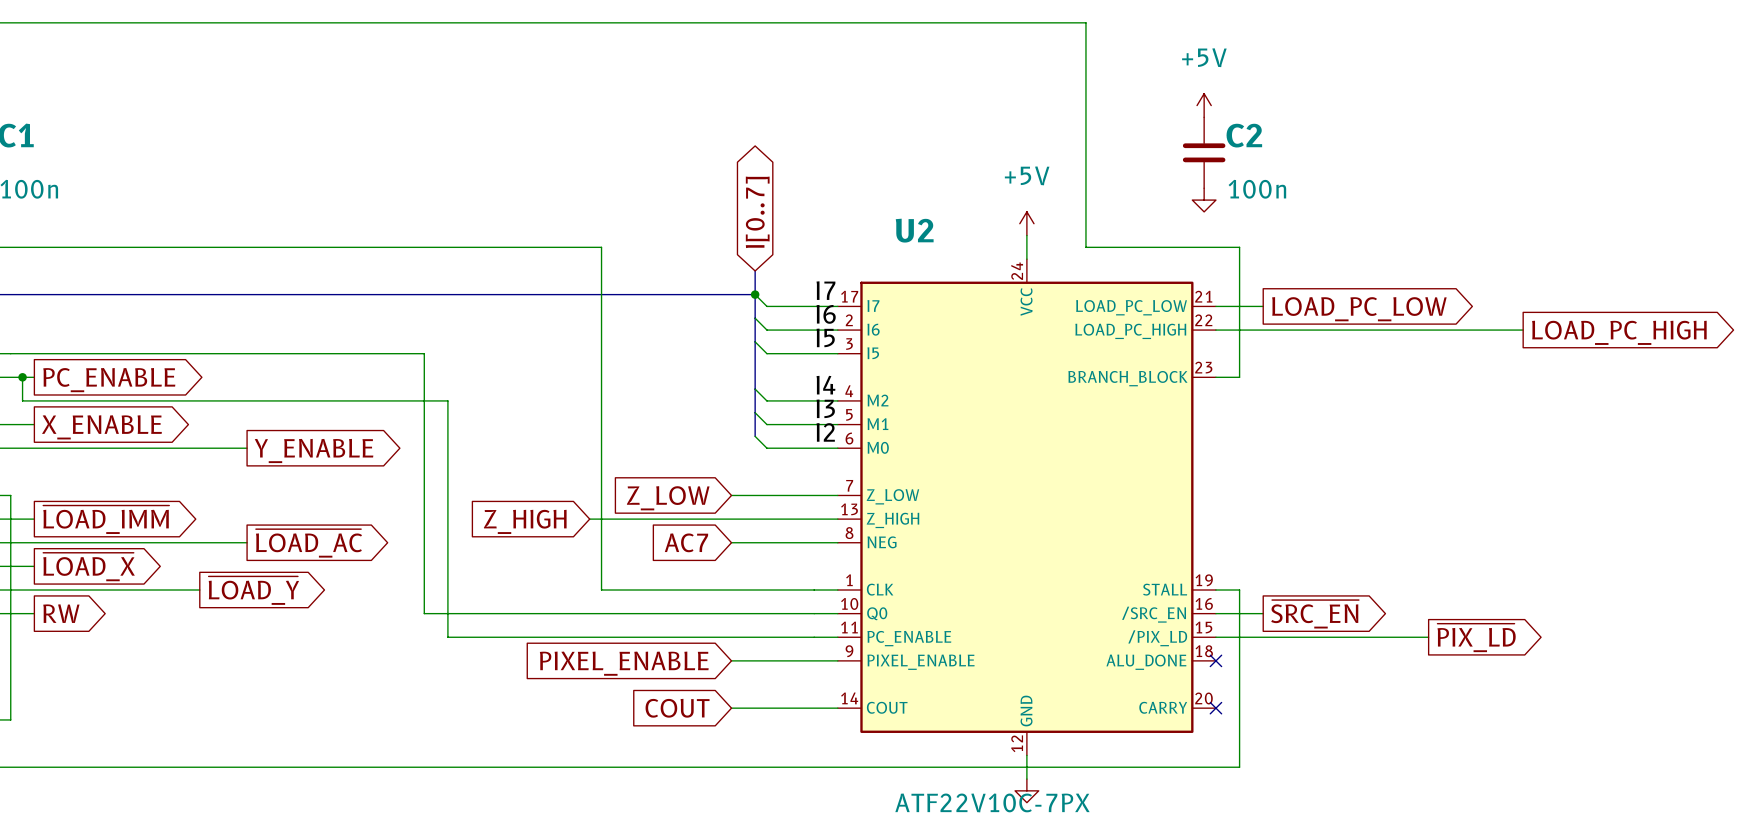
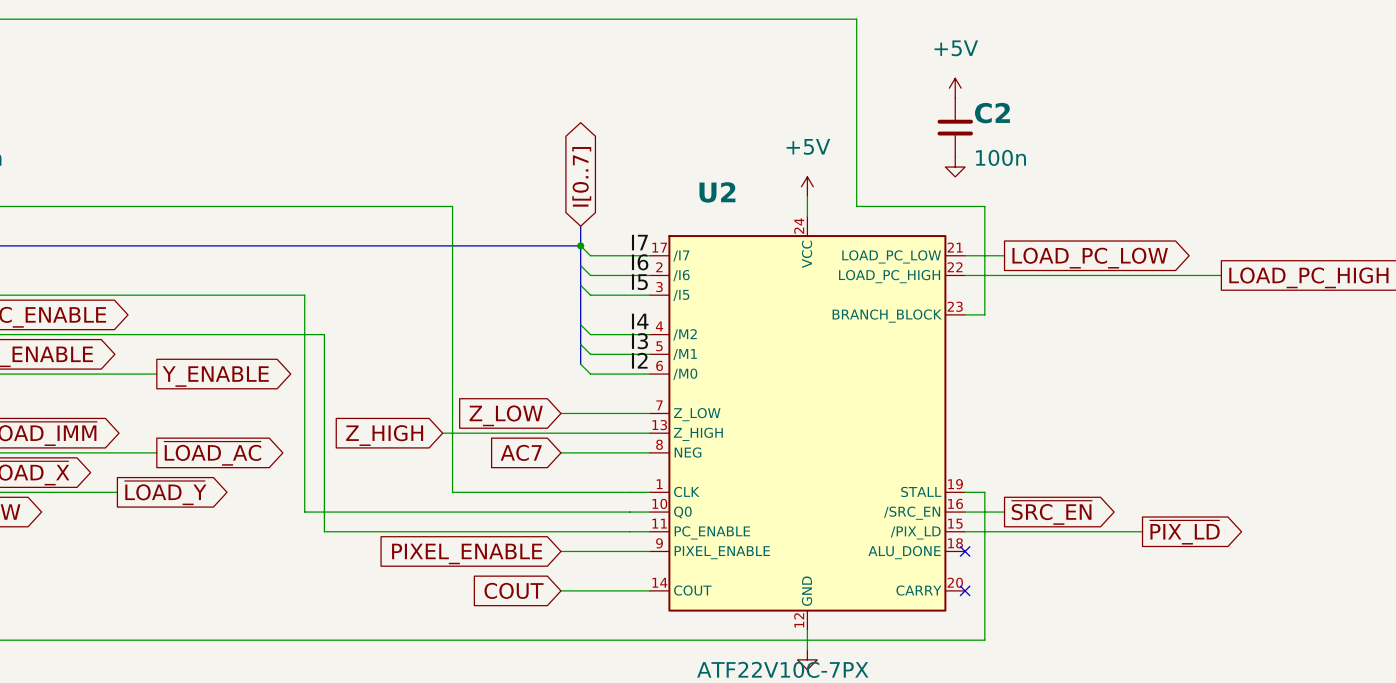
U2 pin name: I7 (873, 305) -> /I7 (681, 256)
U2 pin name: I6 (873, 329) -> /I6 (681, 275)
U2 pin name: I5 (873, 353) -> /I5 (681, 295)
U2 pin name: M2 (877, 400) -> /M2 (685, 334)
U2 pin name: M1 (877, 424) -> /M1 (685, 354)
U2 pin name: M0 (878, 447) -> /M0 (685, 374)

